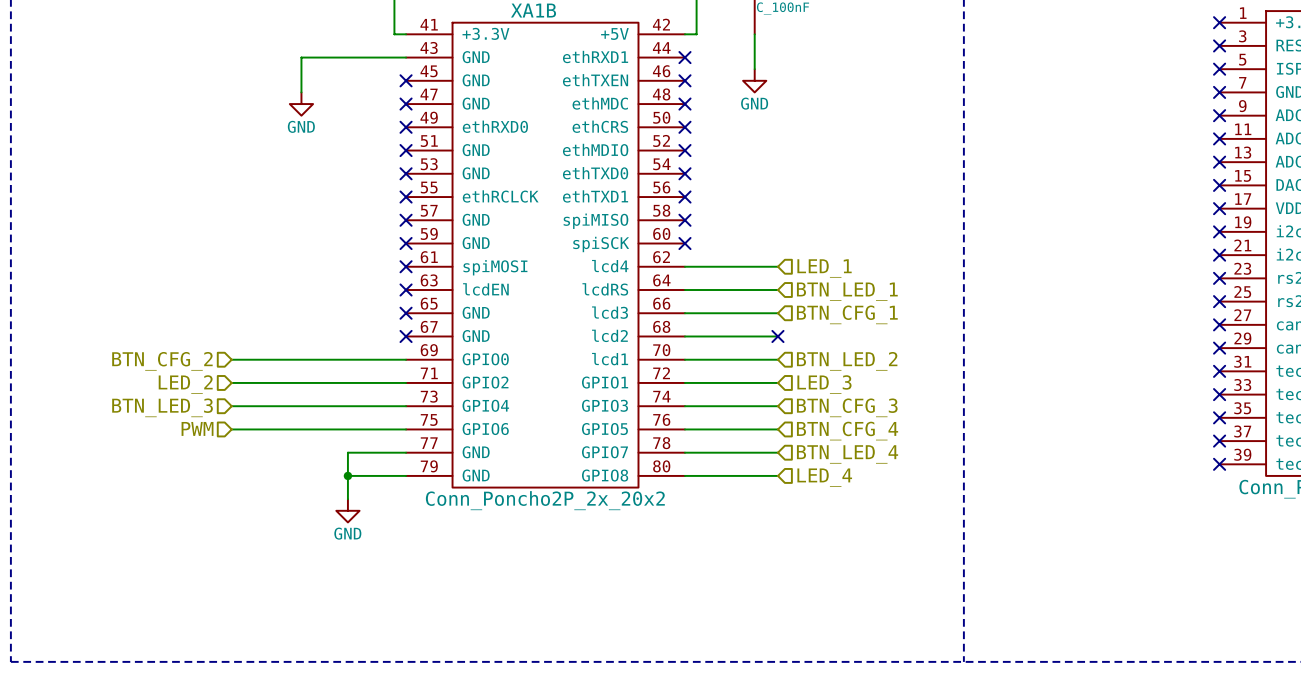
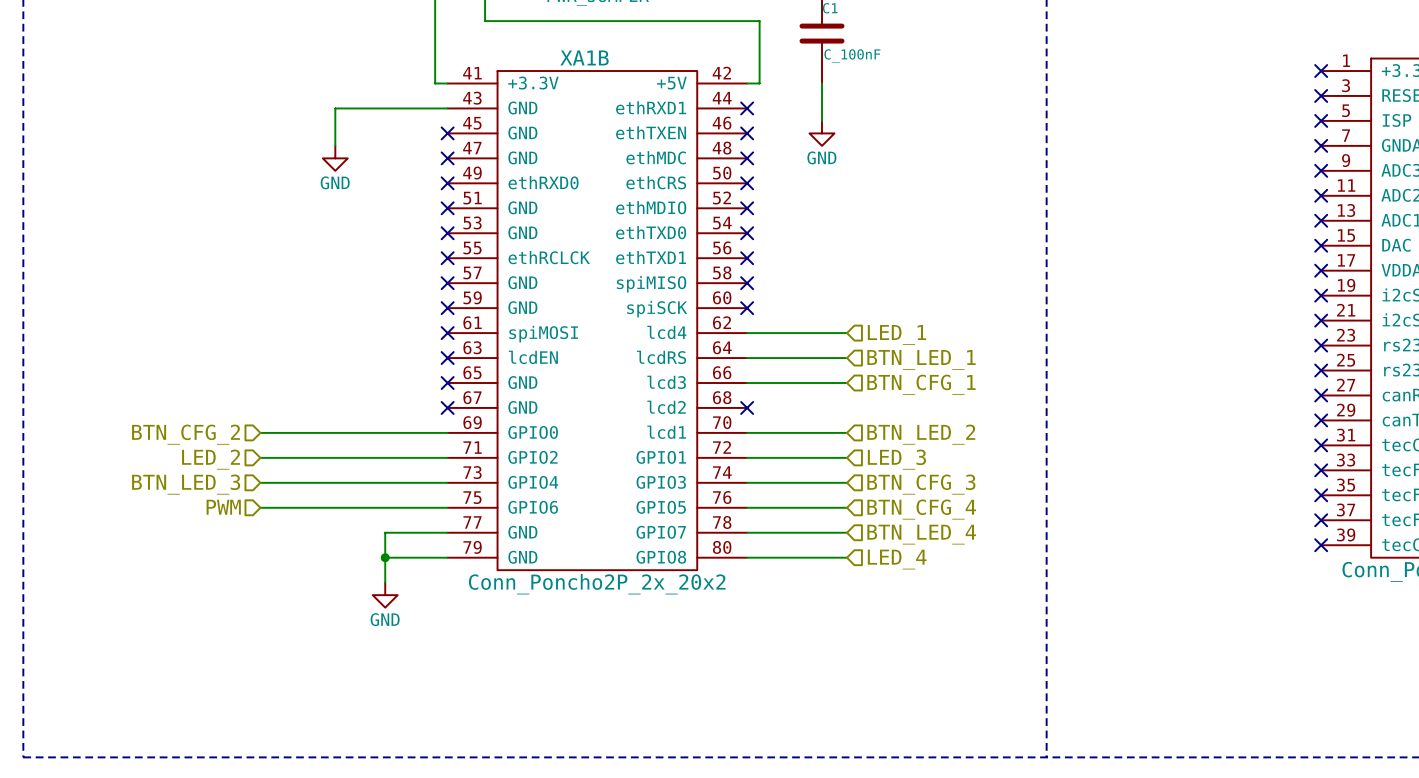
wire: (684, 336) (777, 336) -> none
no-connect mark: none -> (747, 407)
no-connect mark: (777, 336) -> none

